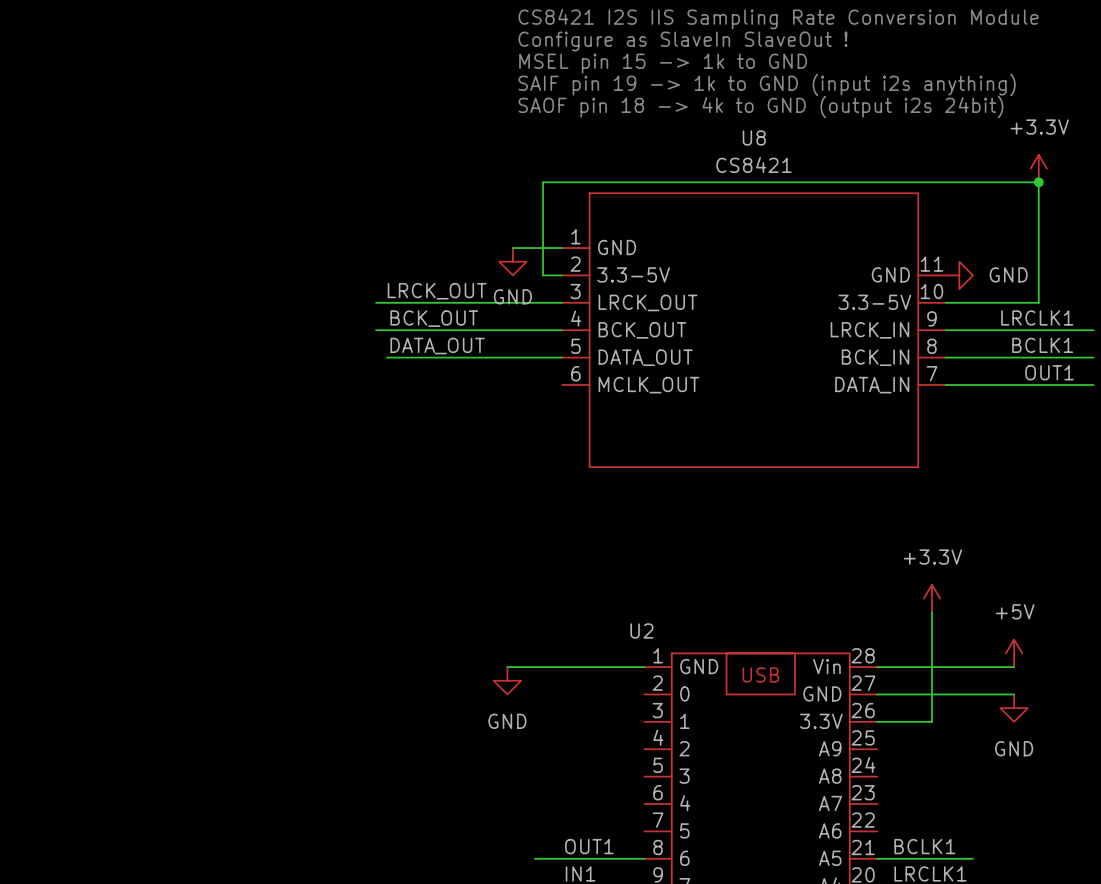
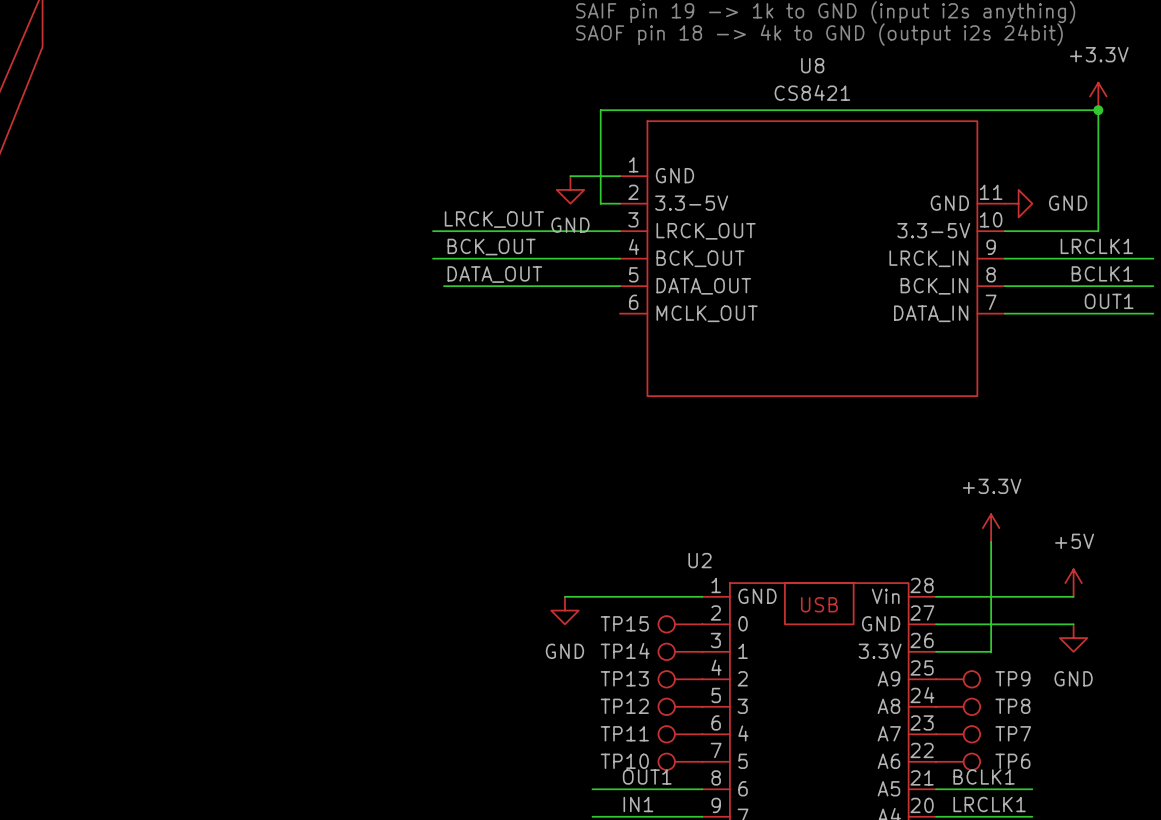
TP15: none -> (680, 624)
TP14: none -> (680, 651)
TP13: none -> (680, 679)
TP9: none -> (958, 679)
TP12: none -> (680, 706)
TP8: none -> (958, 706)
TP11: none -> (680, 734)
TP7: none -> (958, 734)
TP10: none -> (680, 761)
TP6: none -> (958, 761)

